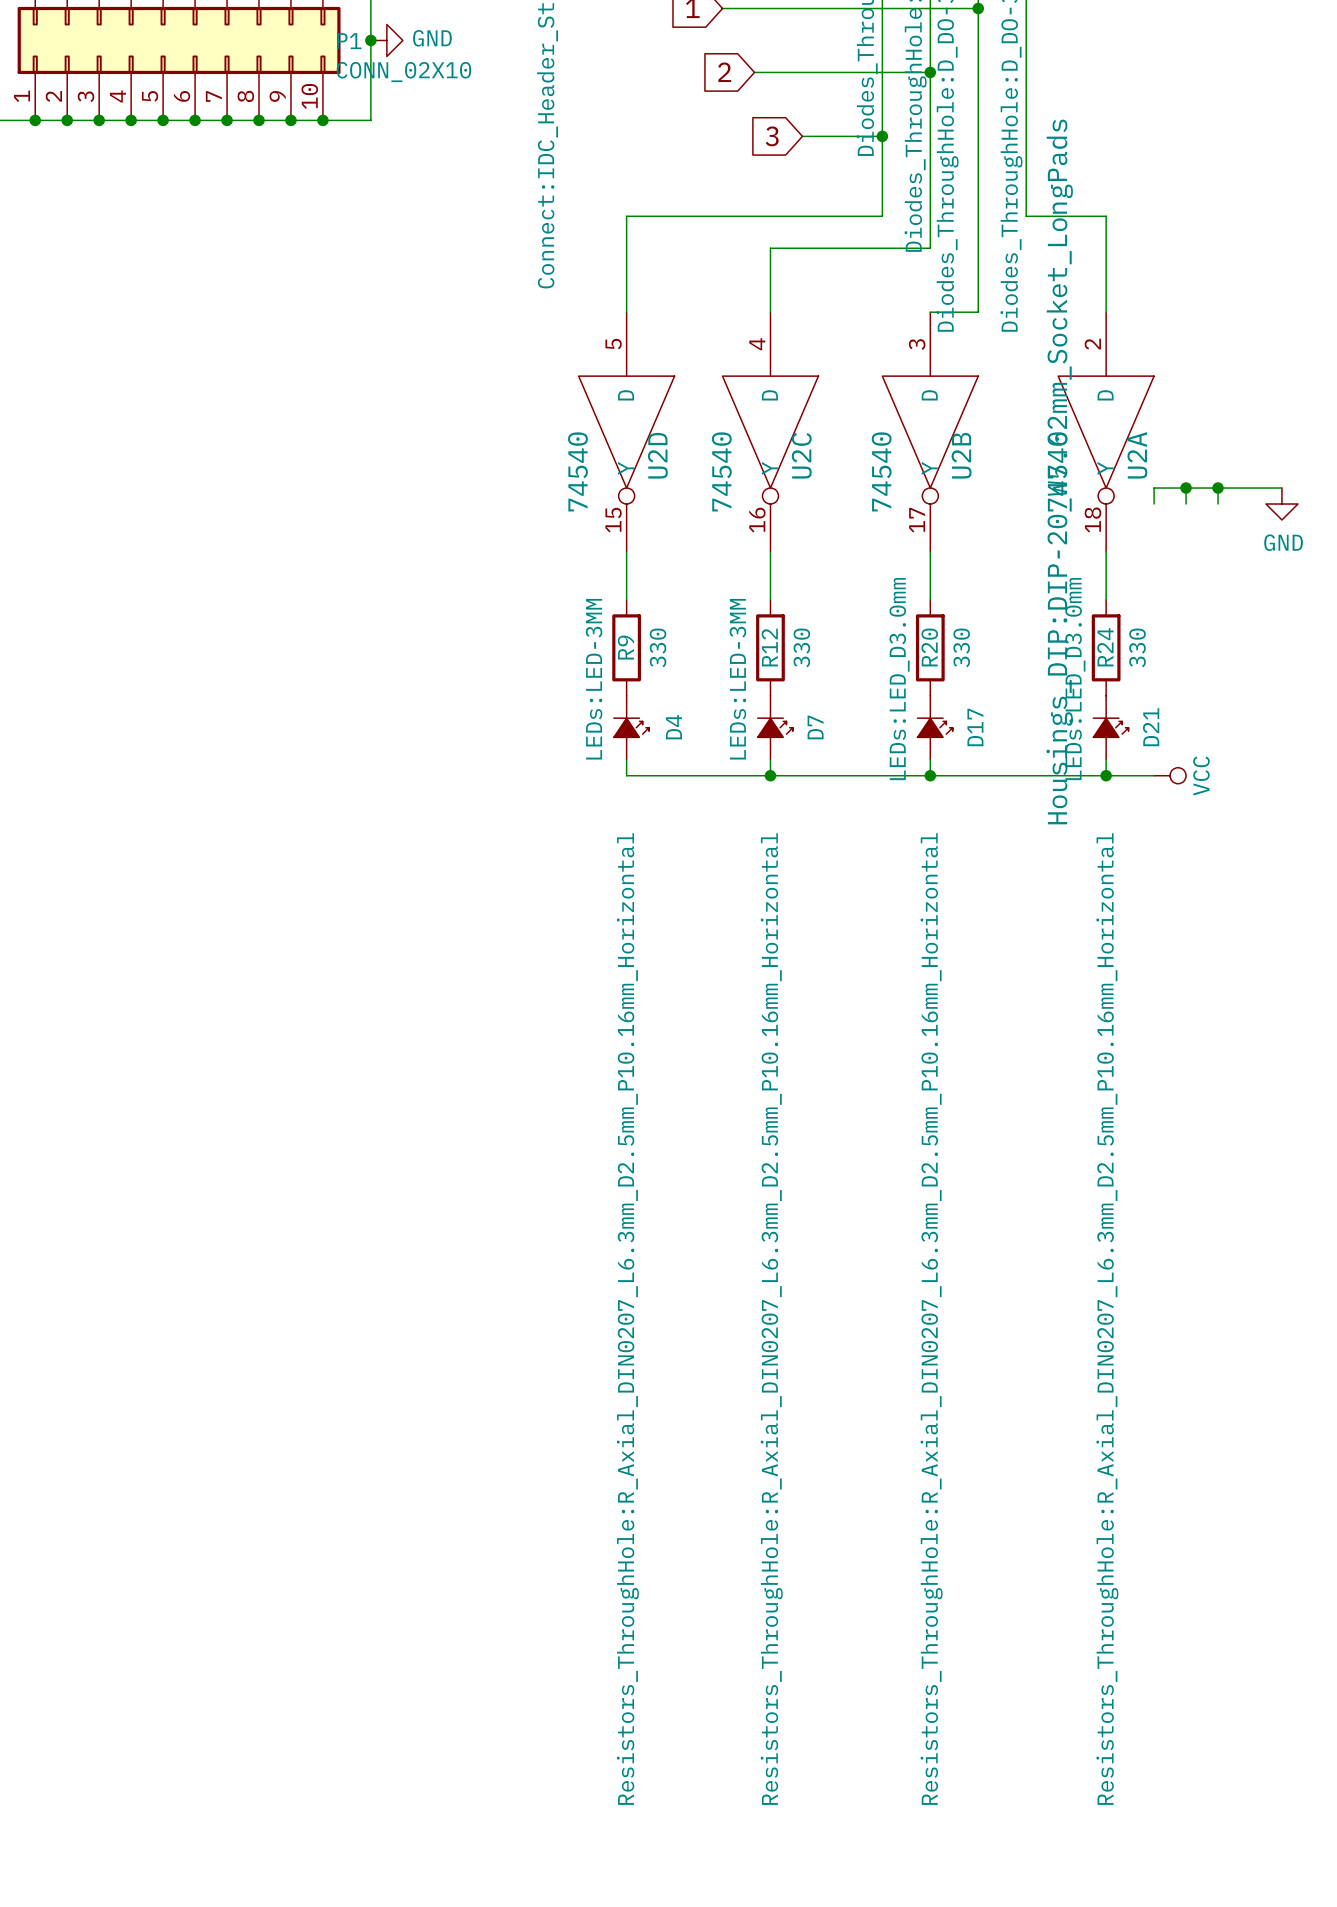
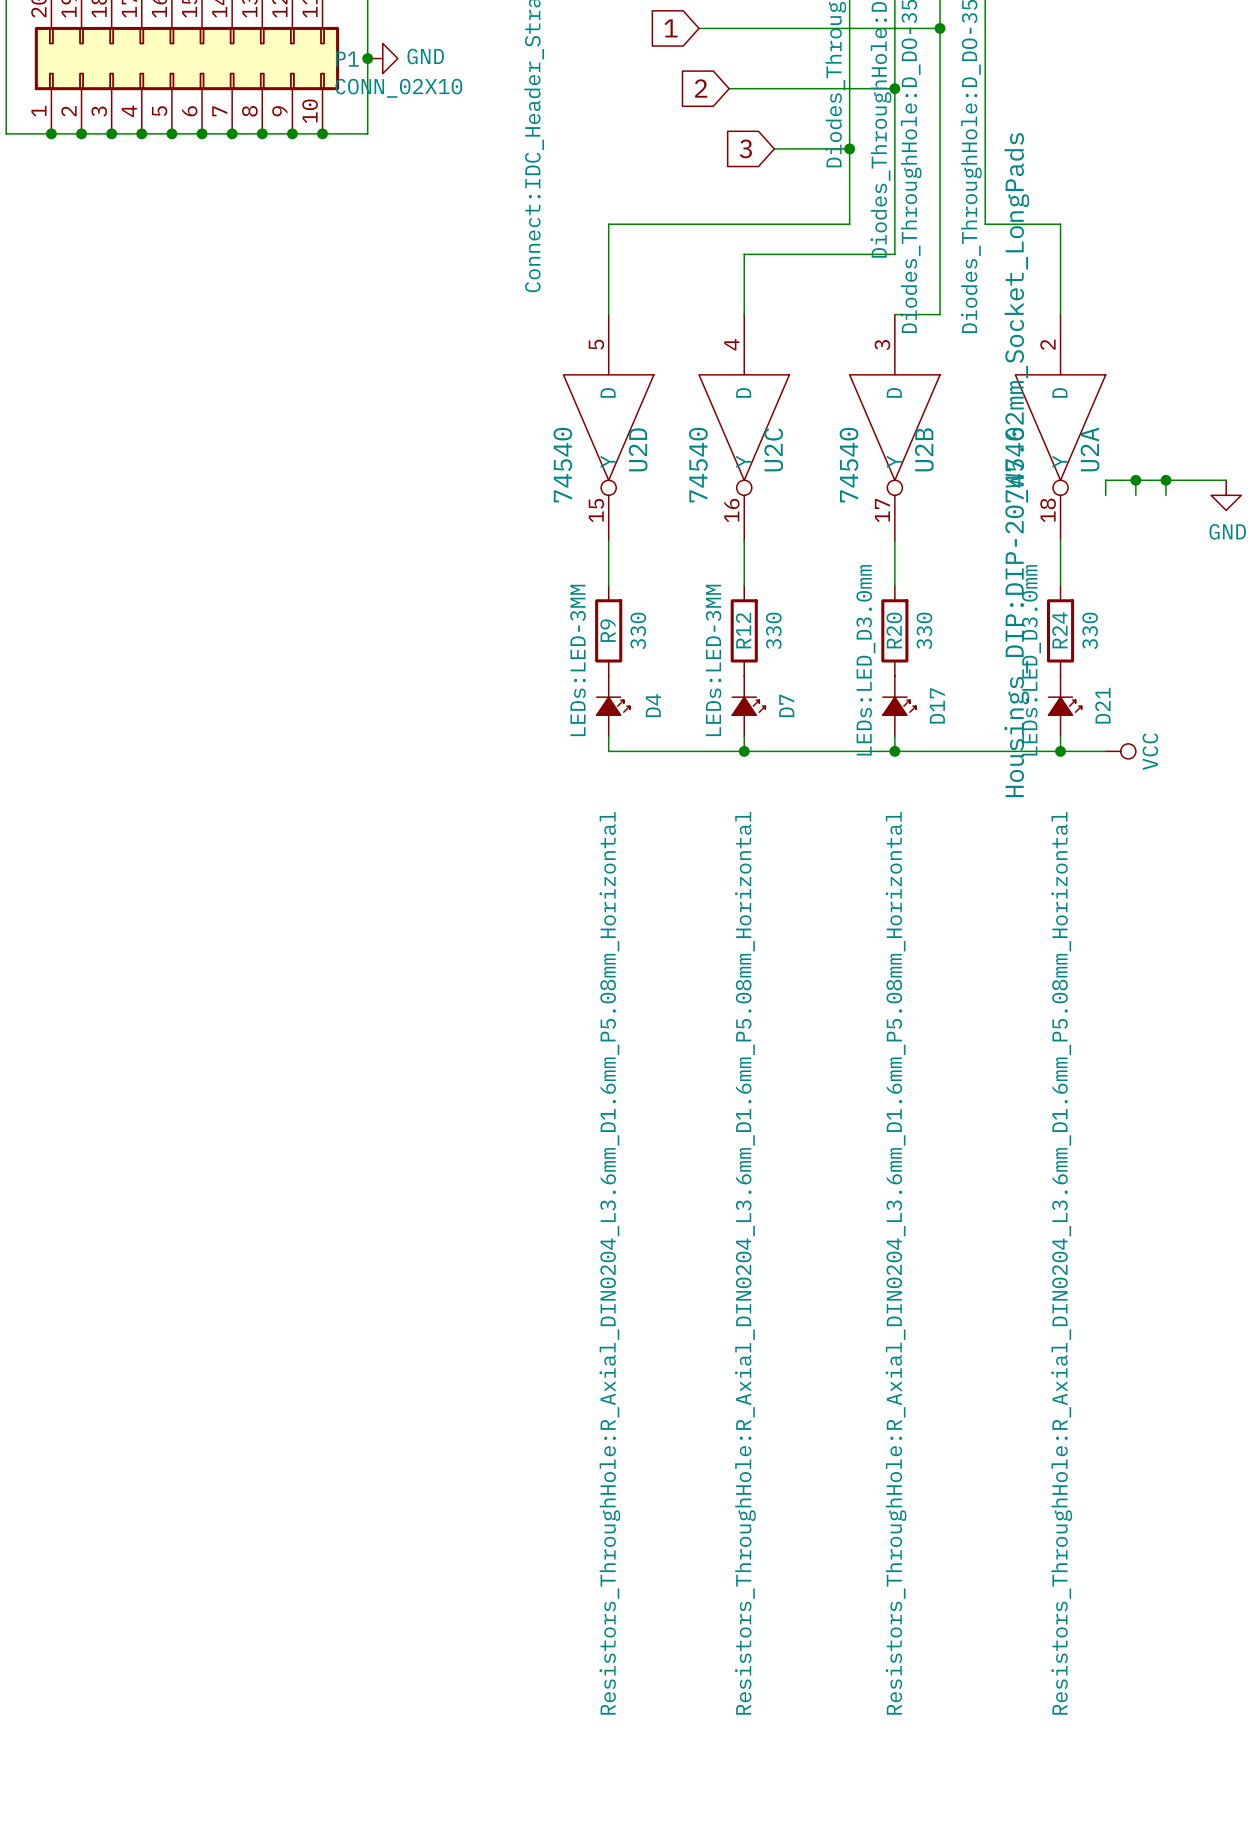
R9 text: Resistors_ThroughHole:R_Axial_DIN0207_L6.3mm_D2.5mm_P10.16mm_Horizontal (627, 1319) -> Resistors_ThroughHole:R_Axial_DIN0204_L3.6mm_D1.6mm_P5.08mm_Horizontal (609, 1263)
R12 text: Resistors_ThroughHole:R_Axial_DIN0207_L6.3mm_D2.5mm_P10.16mm_Horizontal (771, 1319) -> Resistors_ThroughHole:R_Axial_DIN0204_L3.6mm_D1.6mm_P5.08mm_Horizontal (745, 1263)
R20 text: Resistors_ThroughHole:R_Axial_DIN0207_L6.3mm_D2.5mm_P10.16mm_Horizontal (931, 1319) -> Resistors_ThroughHole:R_Axial_DIN0204_L3.6mm_D1.6mm_P5.08mm_Horizontal (896, 1263)
R24 text: Resistors_ThroughHole:R_Axial_DIN0207_L6.3mm_D2.5mm_P10.16mm_Horizontal (1107, 1319) -> Resistors_ThroughHole:R_Axial_DIN0204_L3.6mm_D1.6mm_P5.08mm_Horizontal (1061, 1263)

